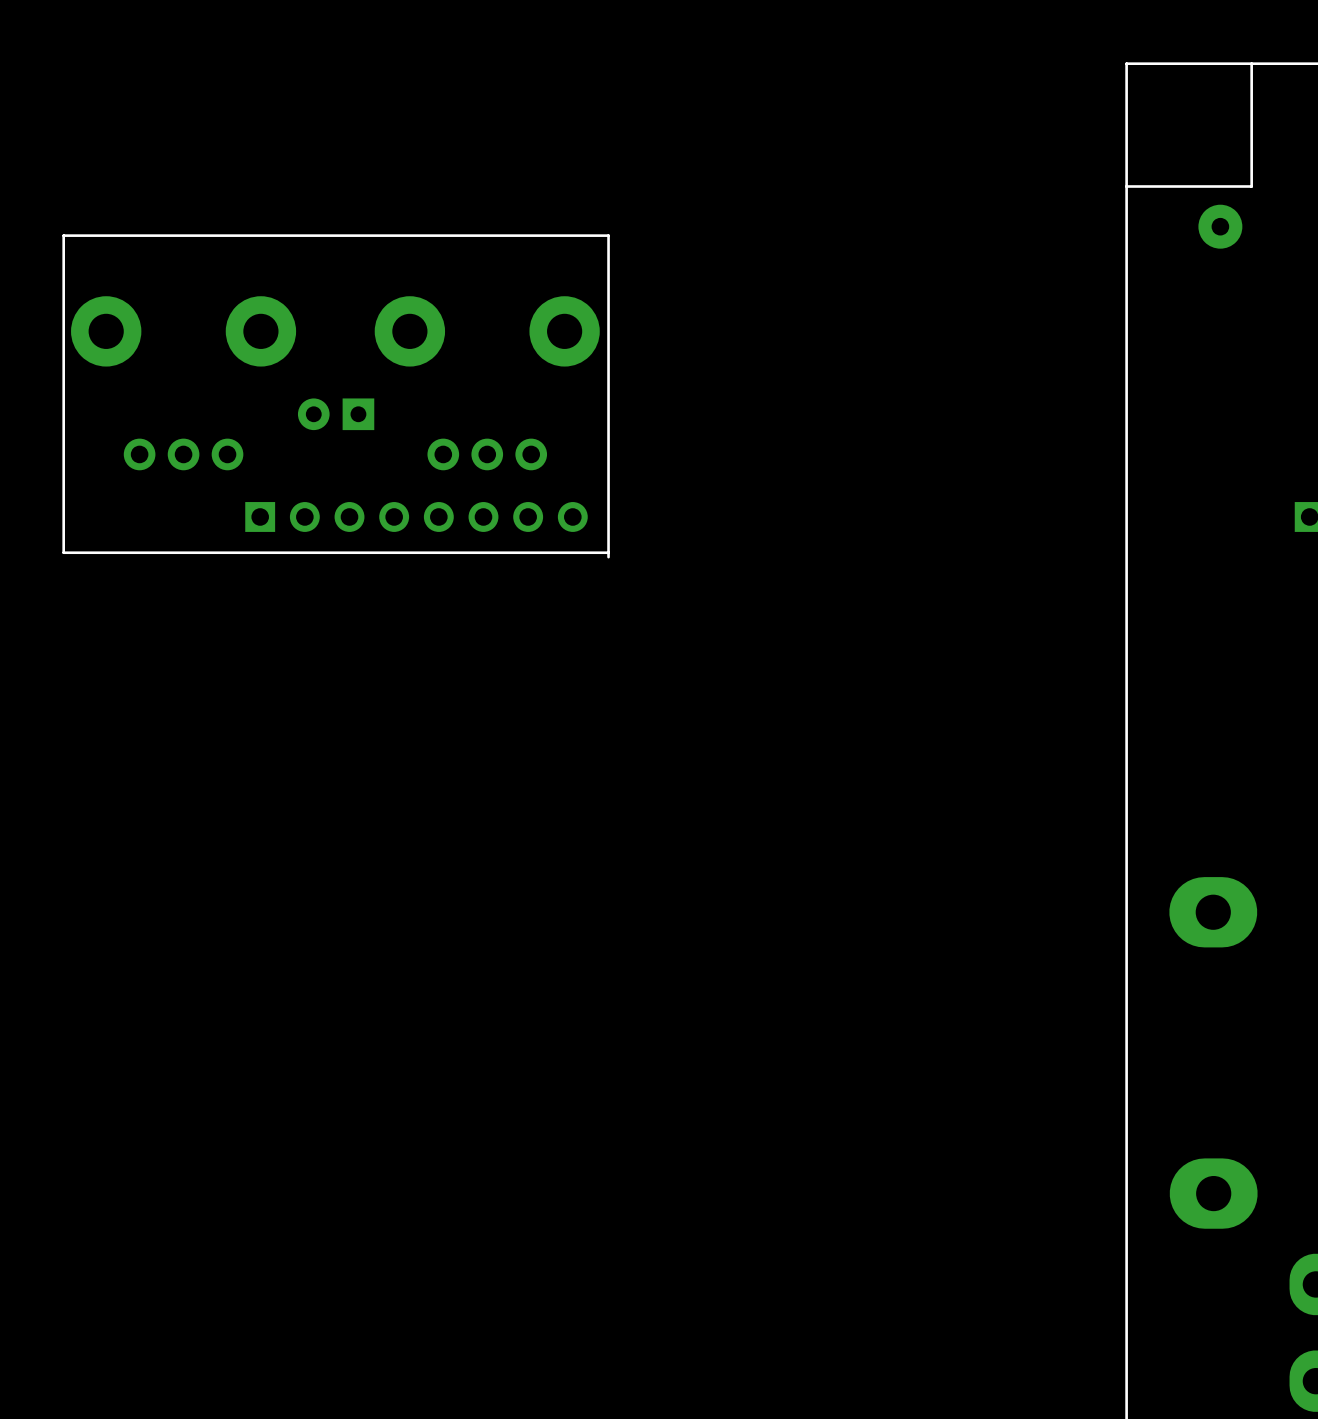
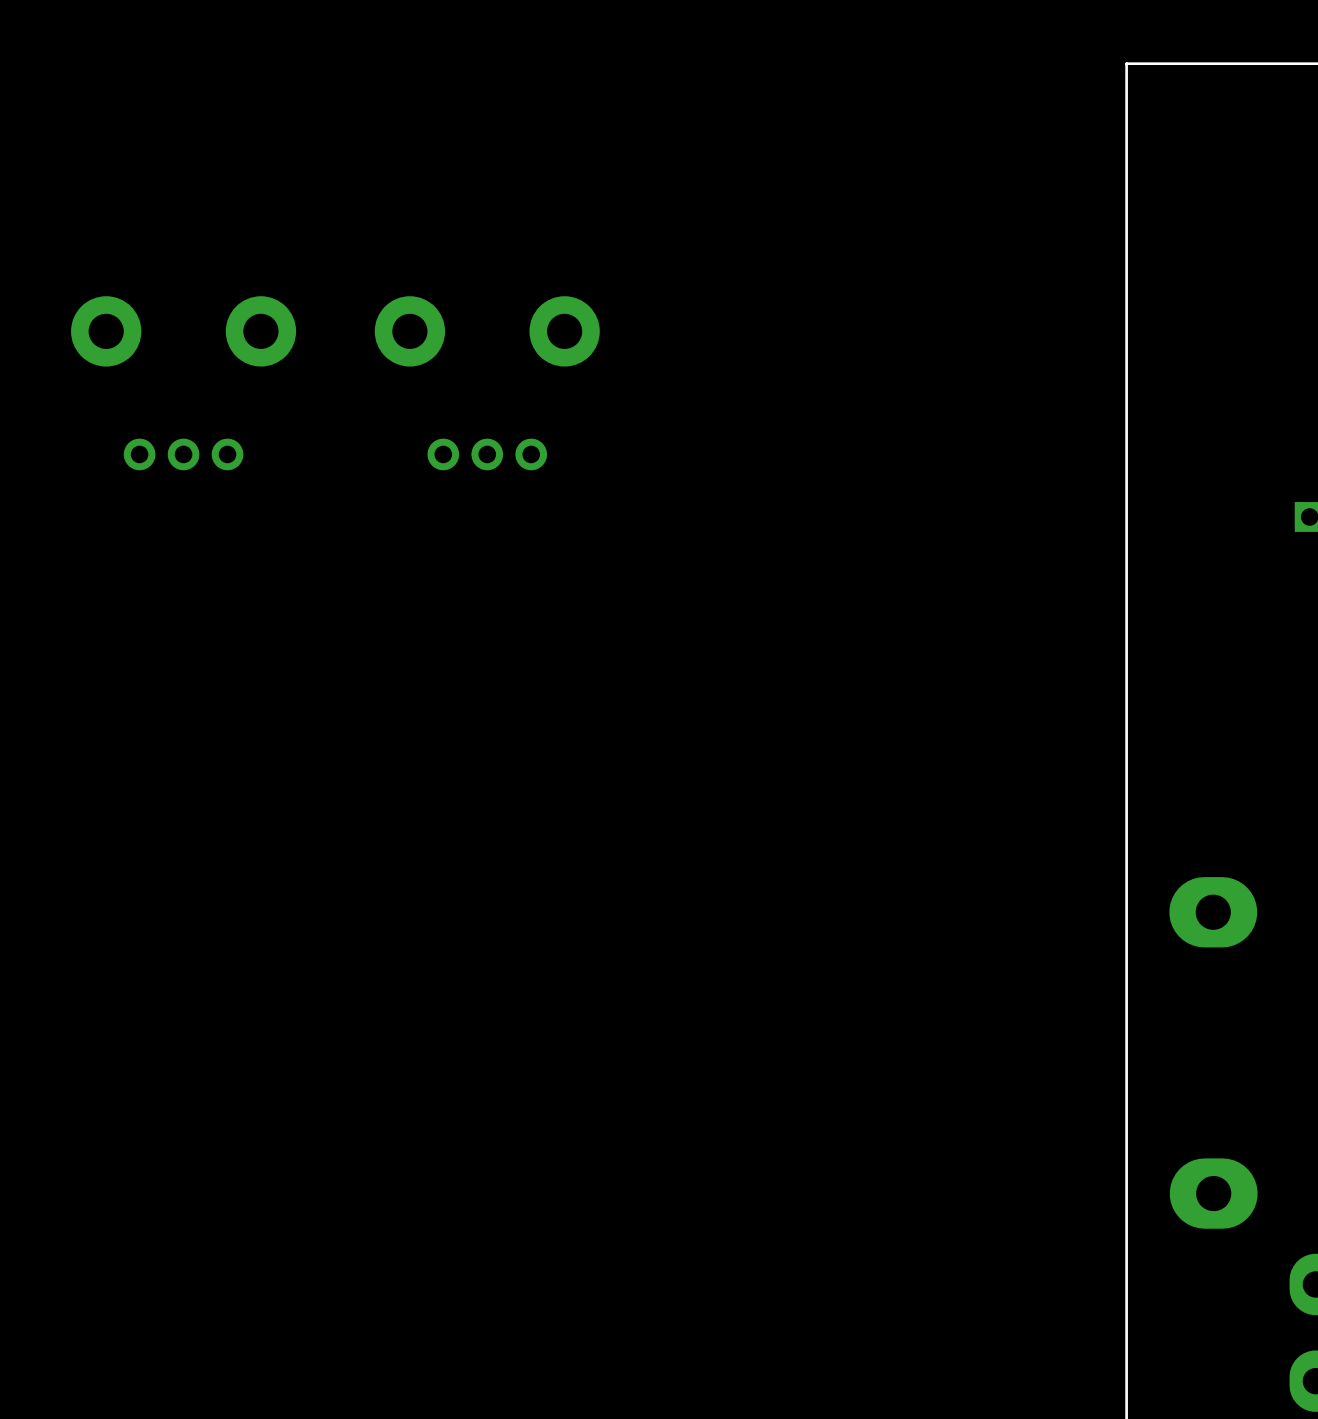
board edge: (1251, 63) (1251, 186) (1126, 186) -> none
part: (1220, 226) -> none
part: (336, 414) -> none
part: (416, 516) -> none
board edge: (608, 552) (63, 552) (63, 235) (608, 235) (608, 557) -> none

